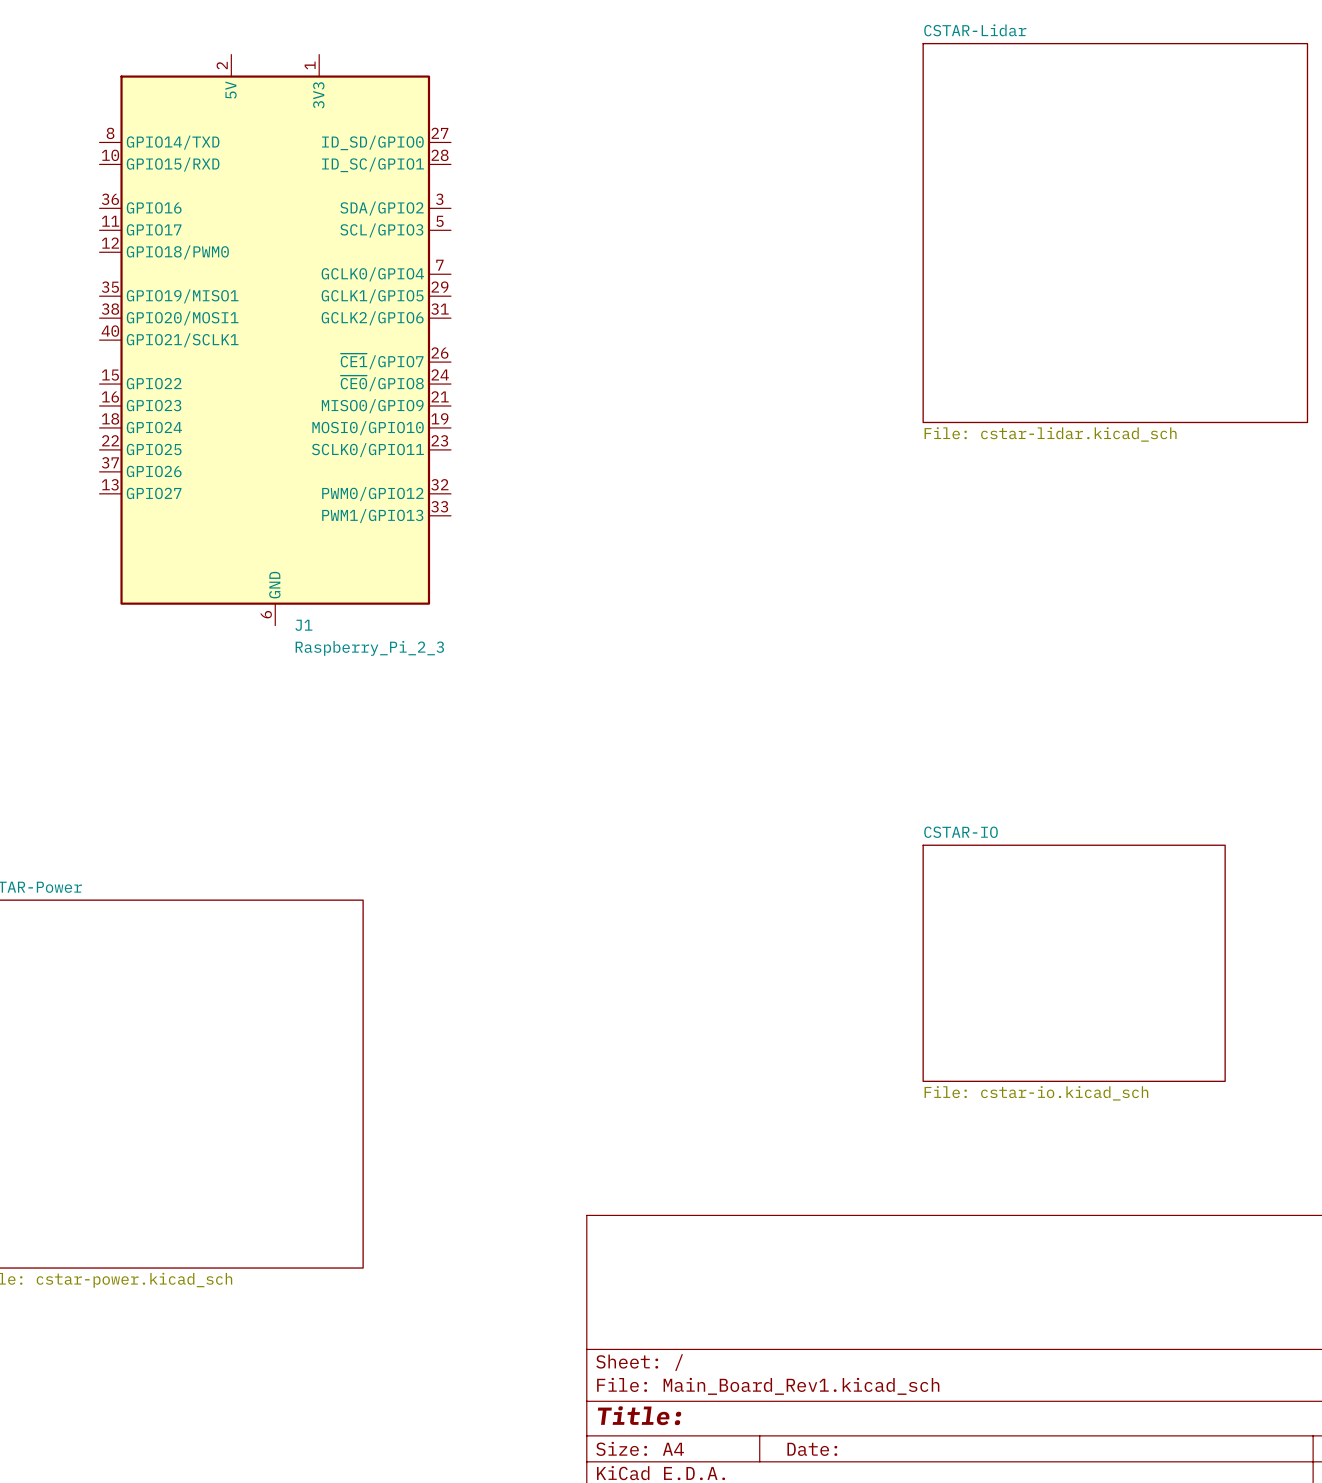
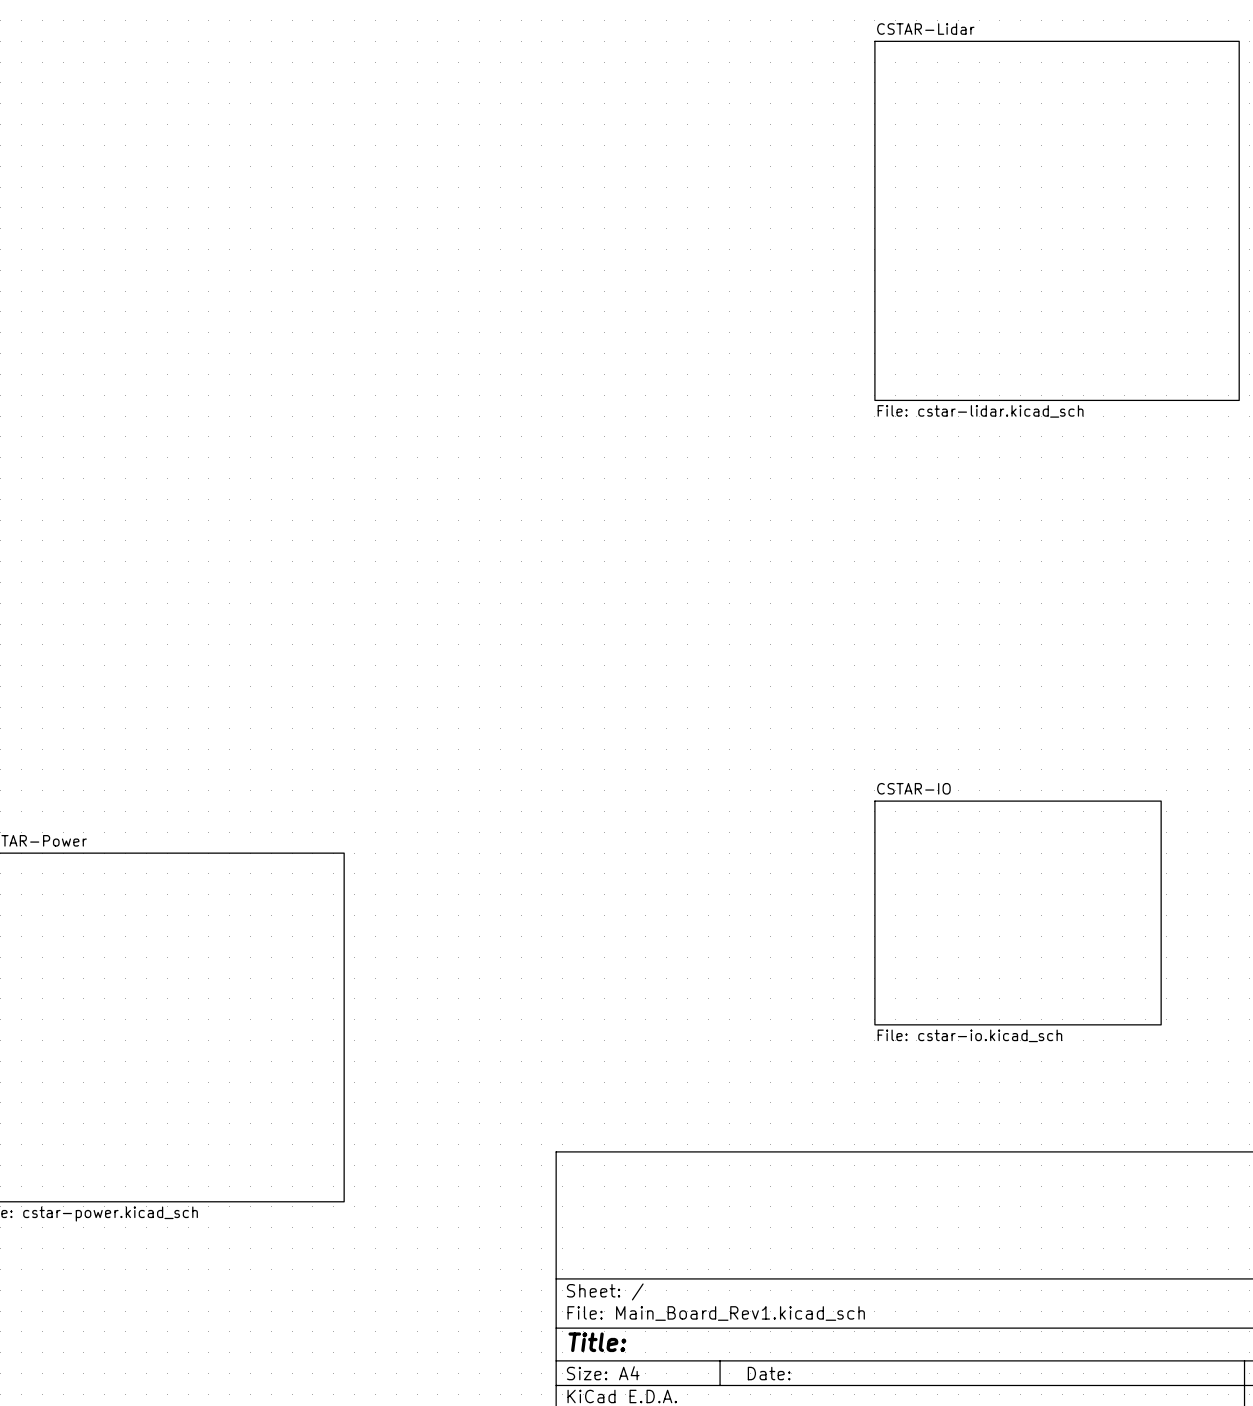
J1: Raspberry_Pi_2_3 (275, 340) -> none

